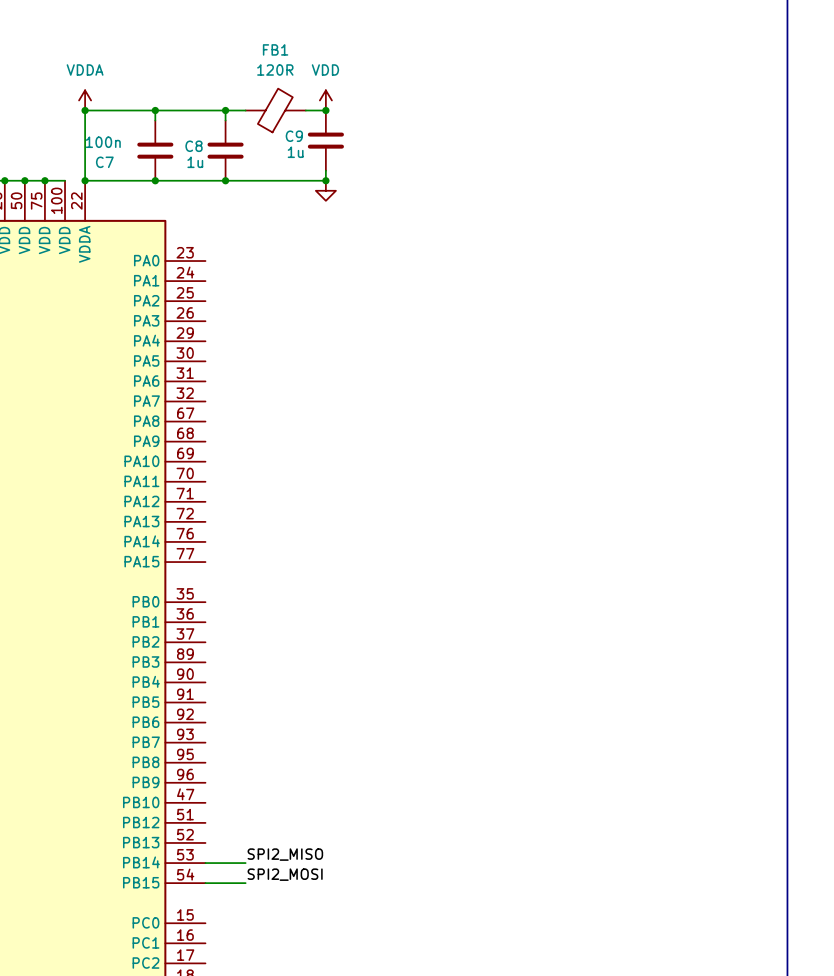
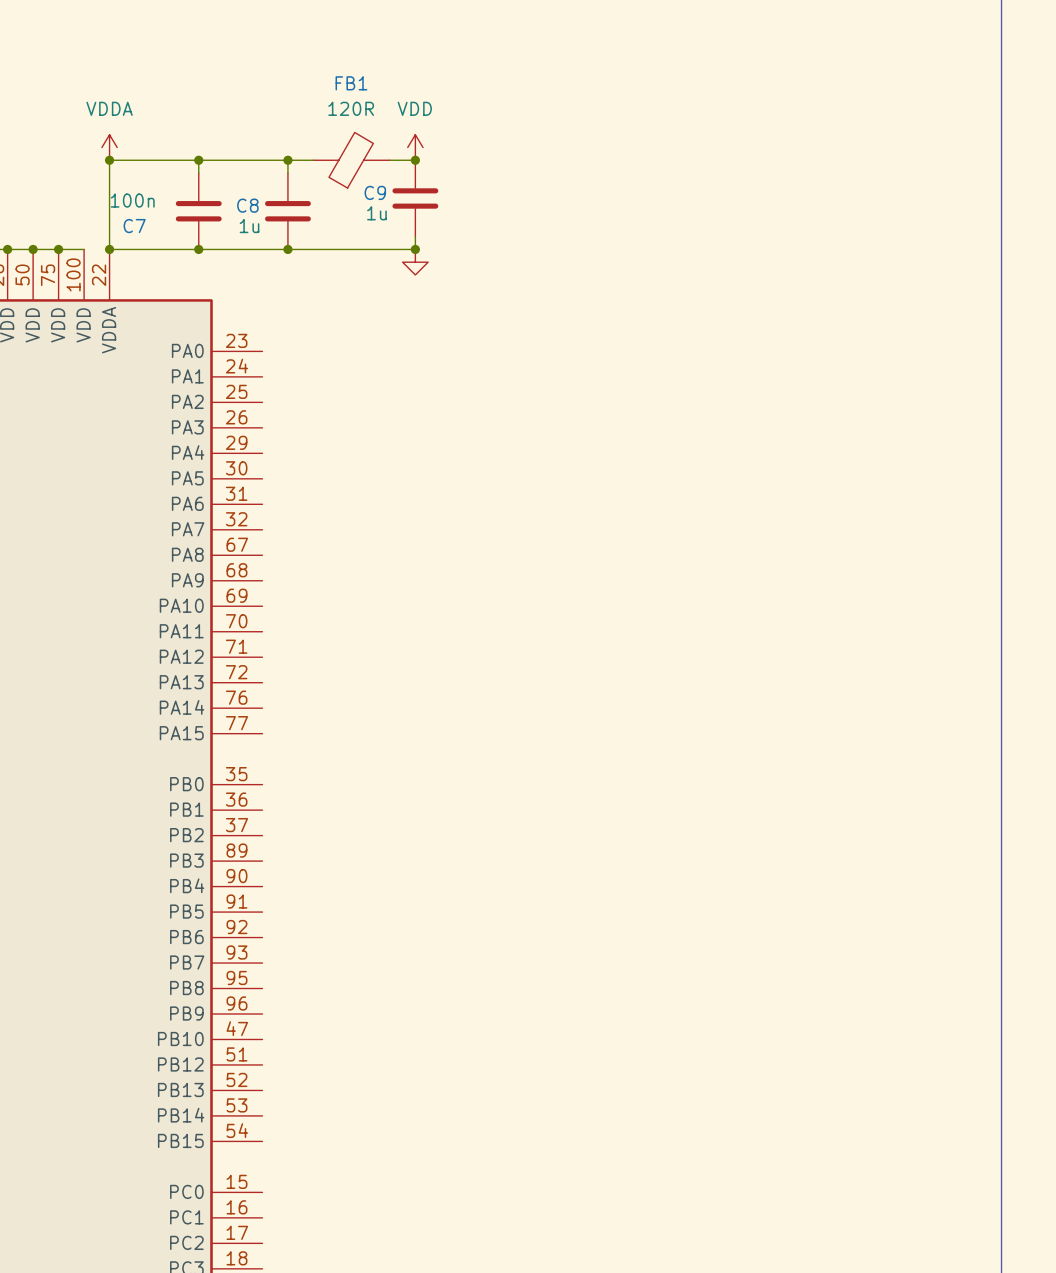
label: SPI2_MISO (285, 854) -> none
wire: (205, 863) (245, 863) -> none
label: SPI2_MOSI (285, 874) -> none
wire: (205, 883) (245, 883) -> none

